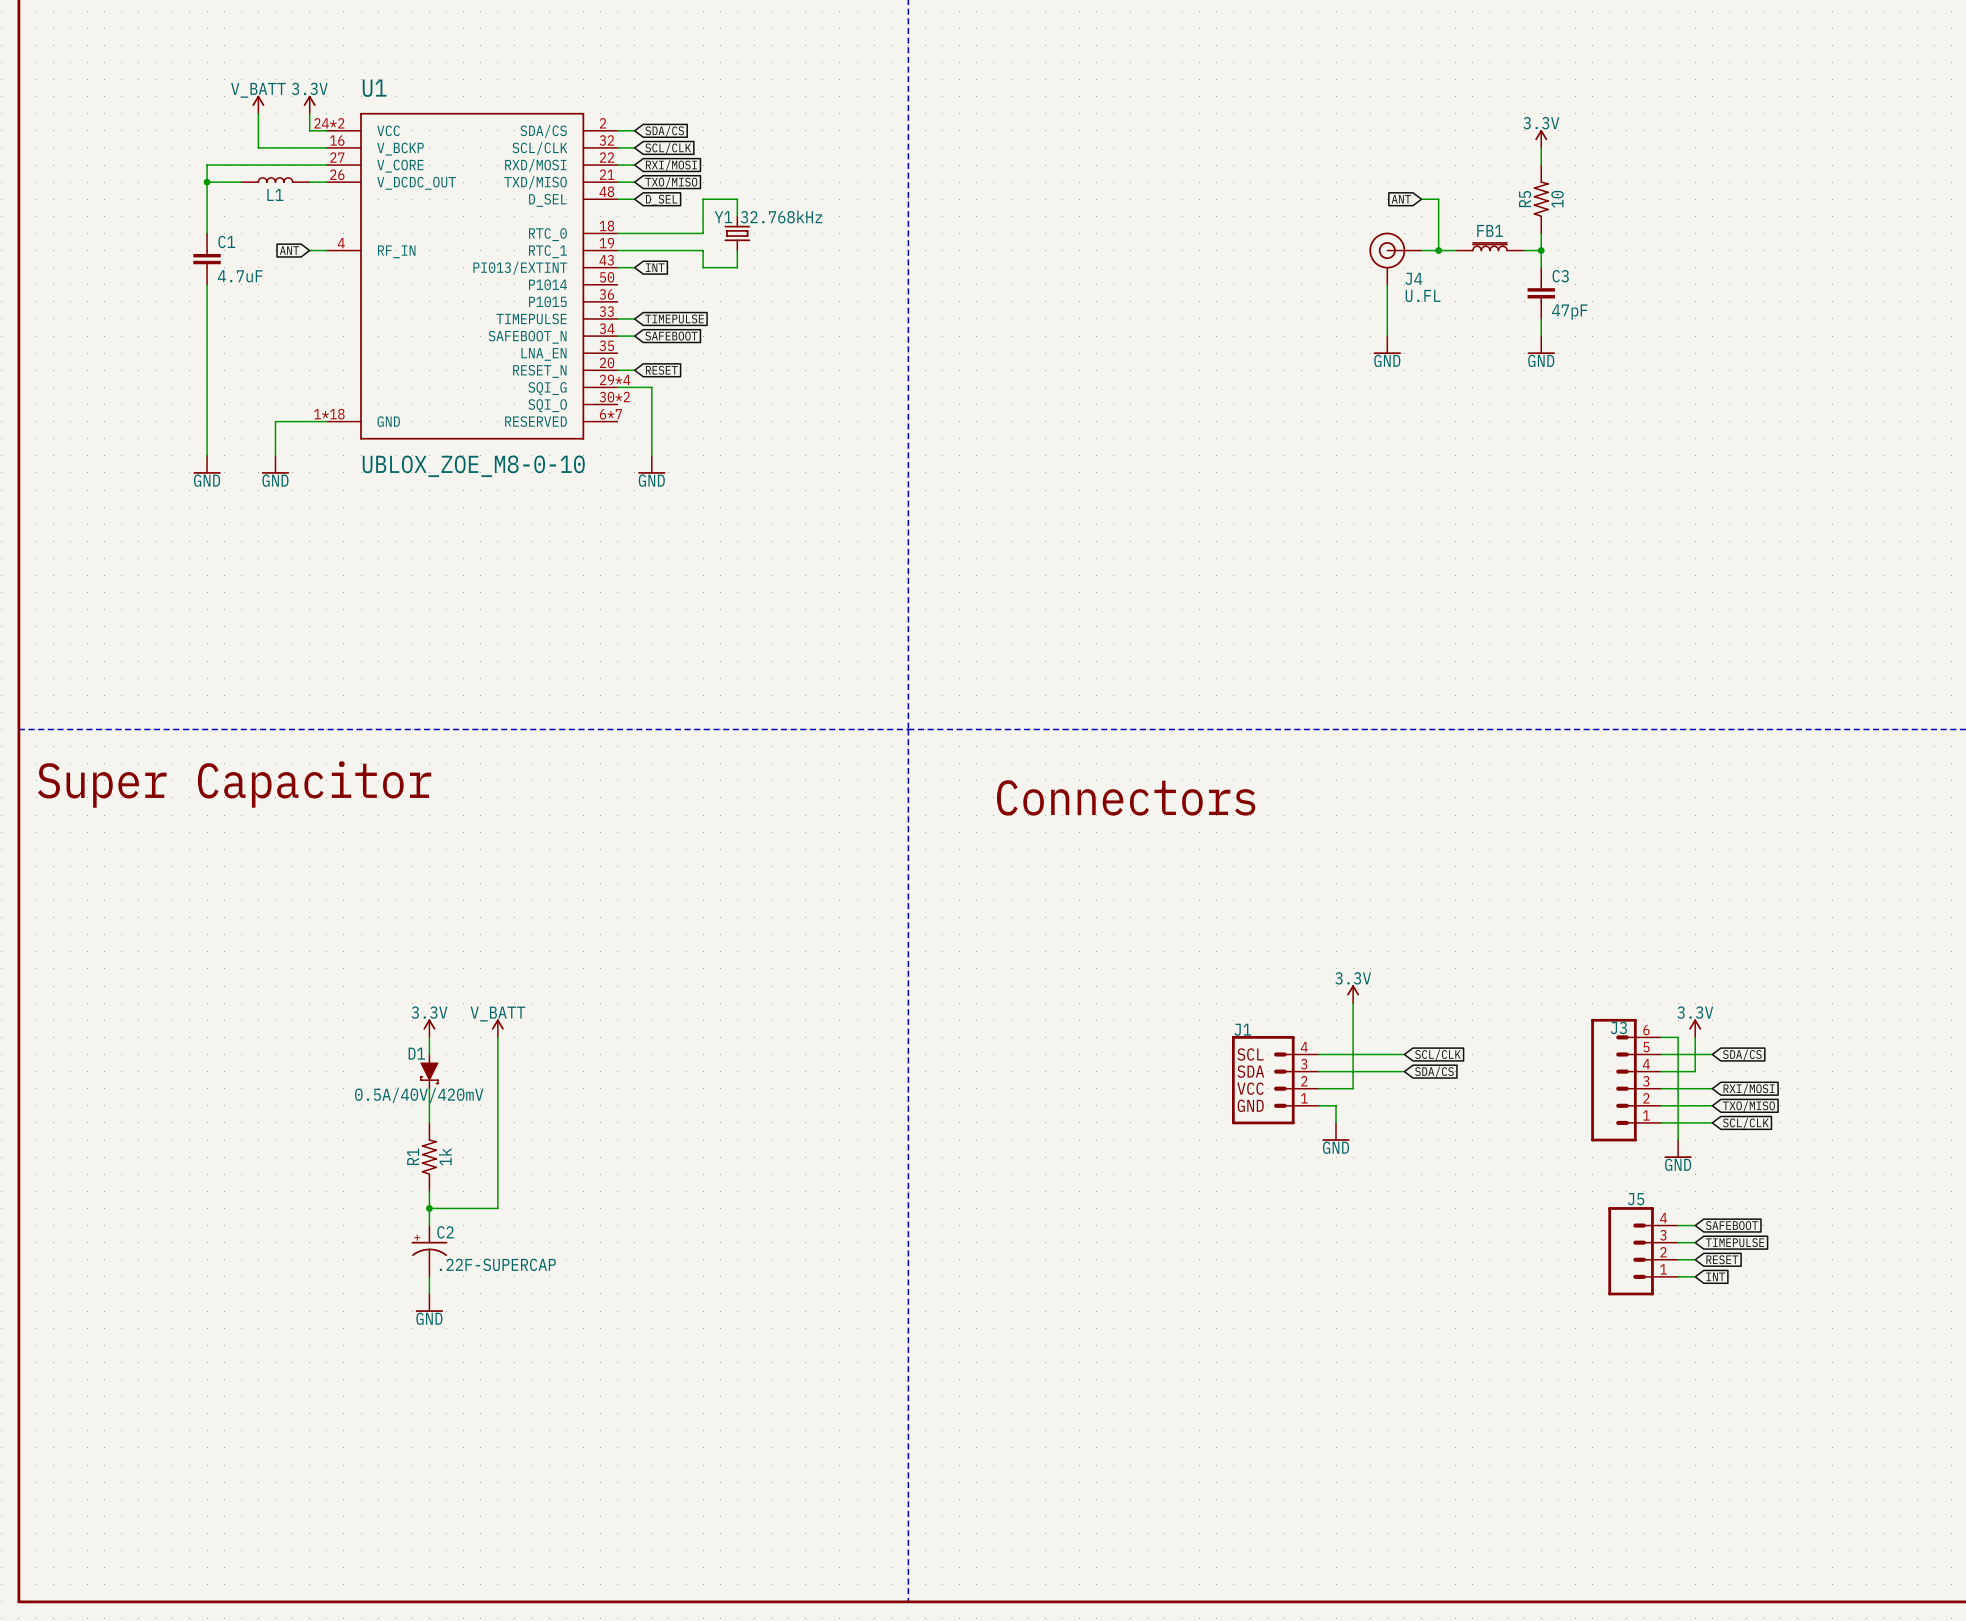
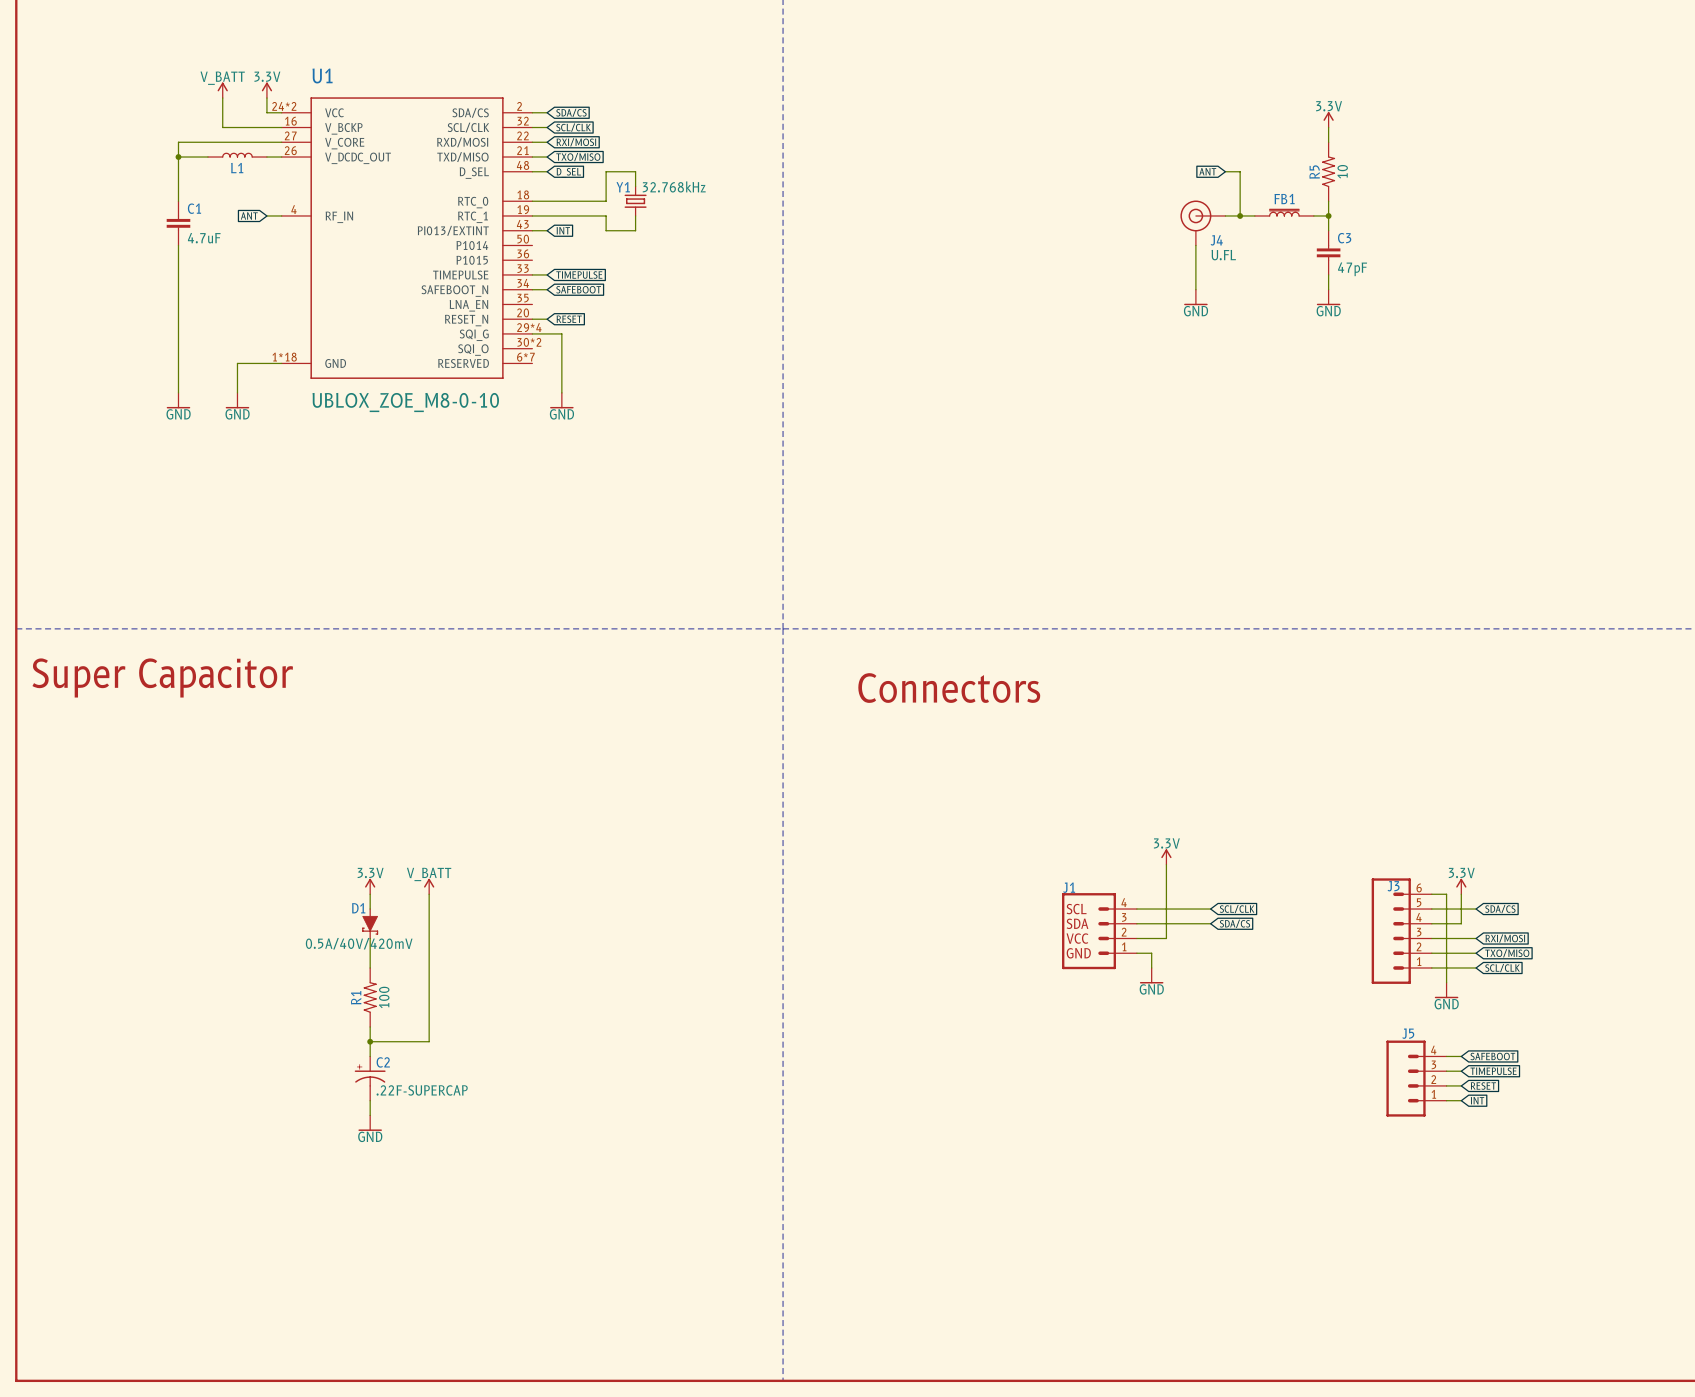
R1 value: 1k (445, 1156) -> 100 (384, 997)

